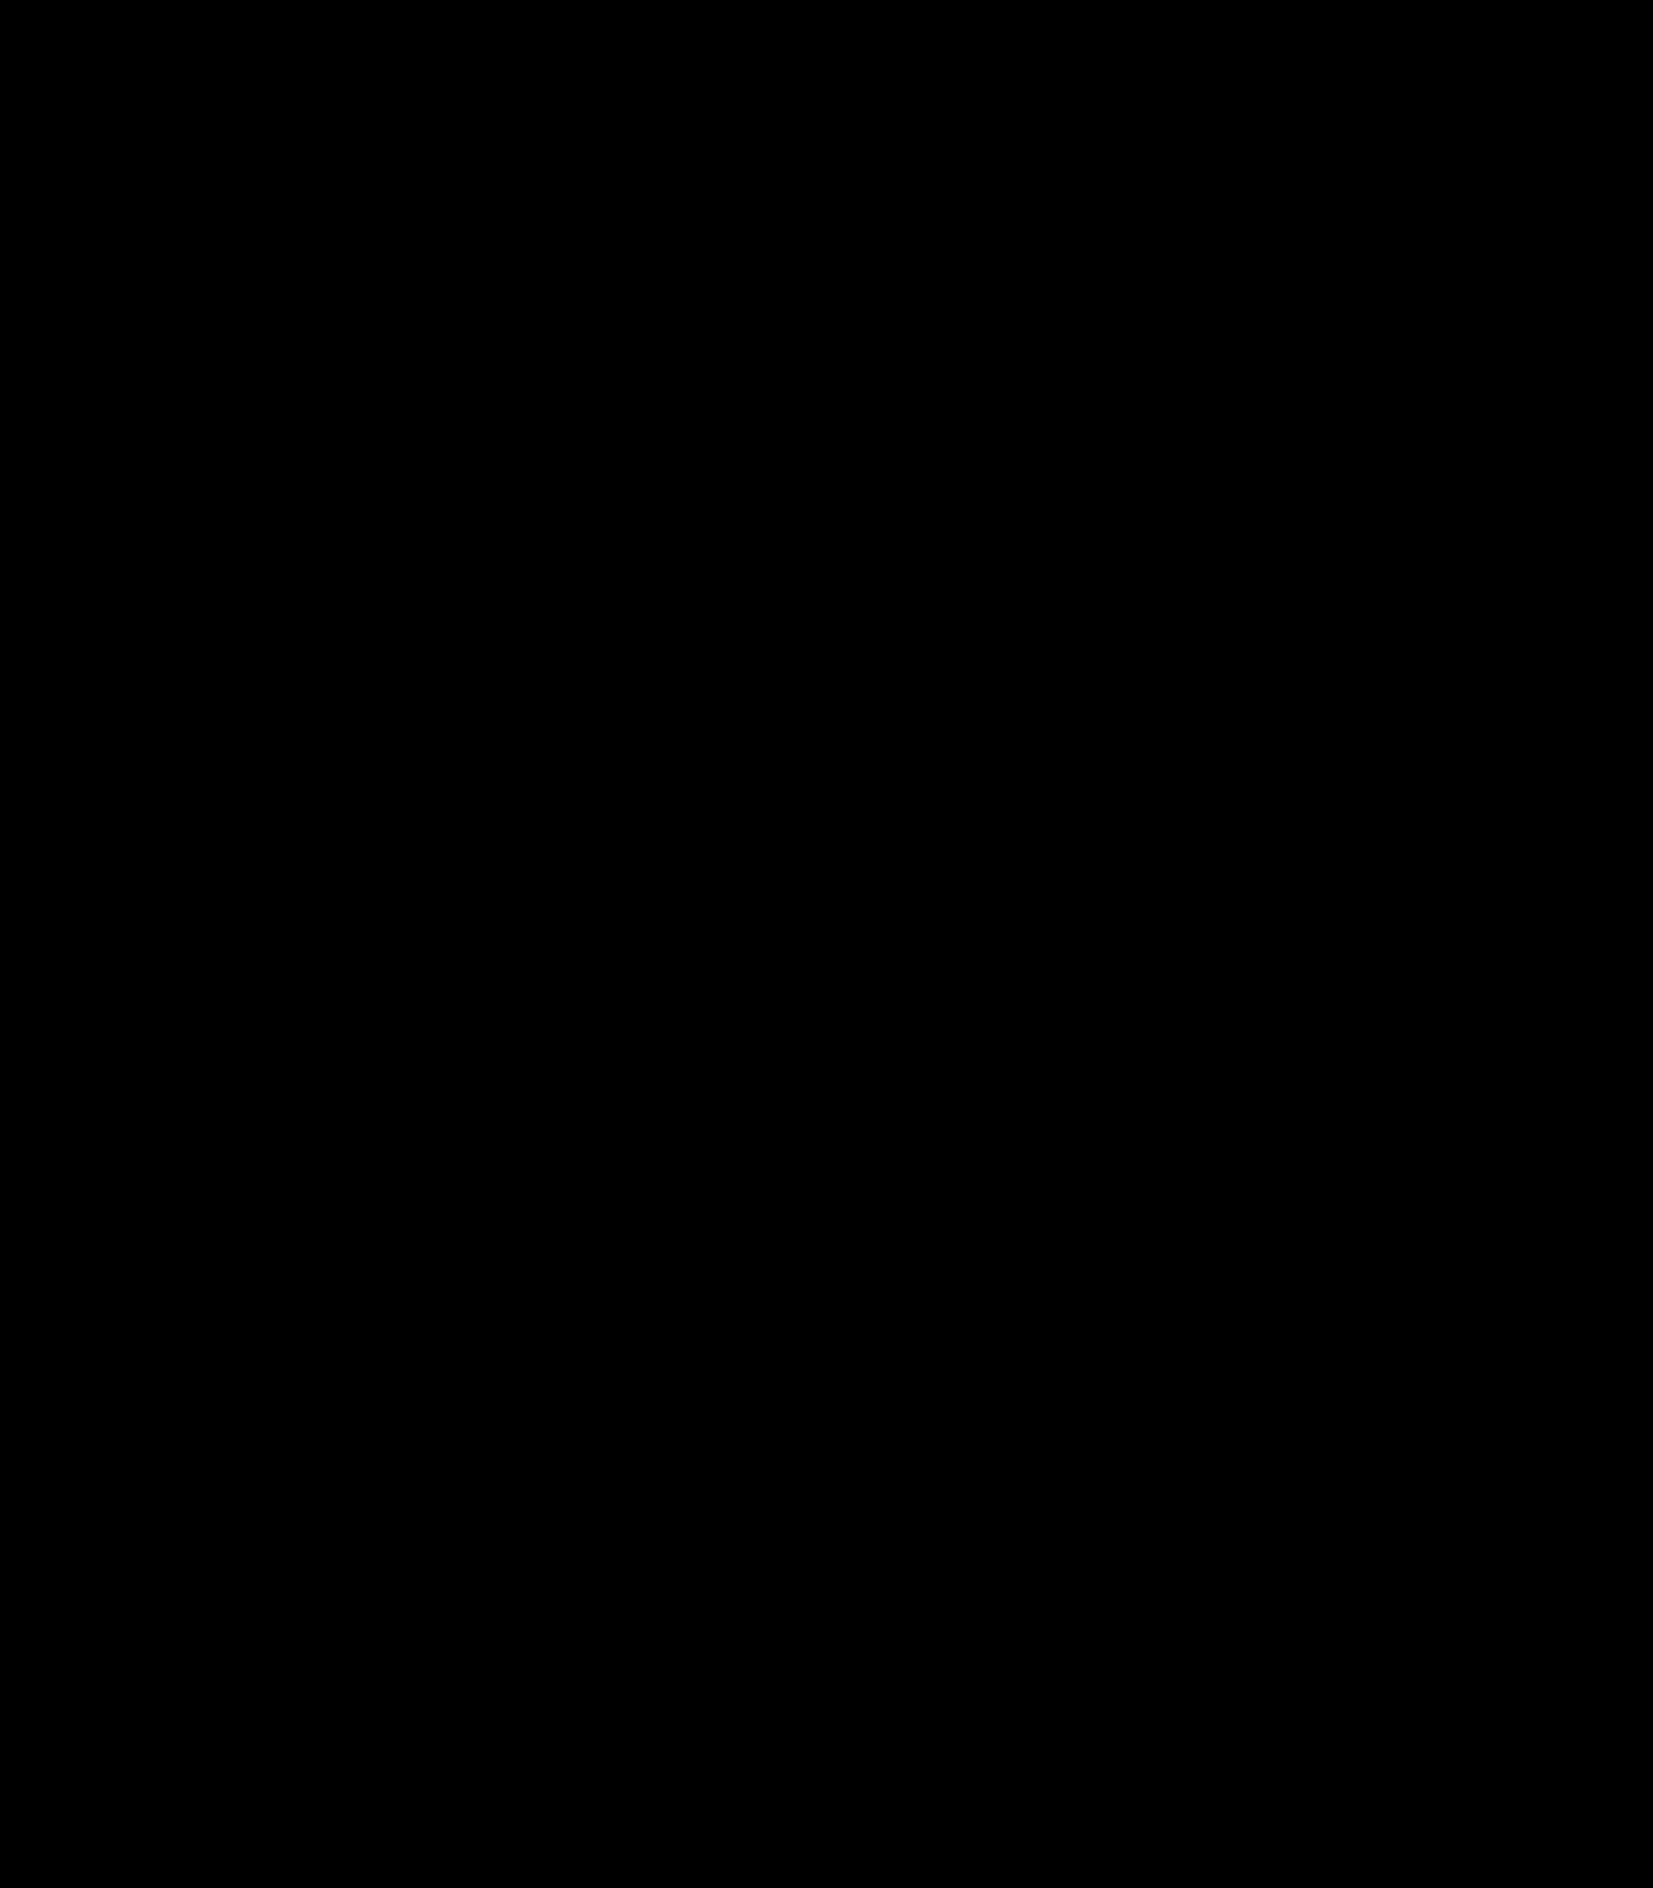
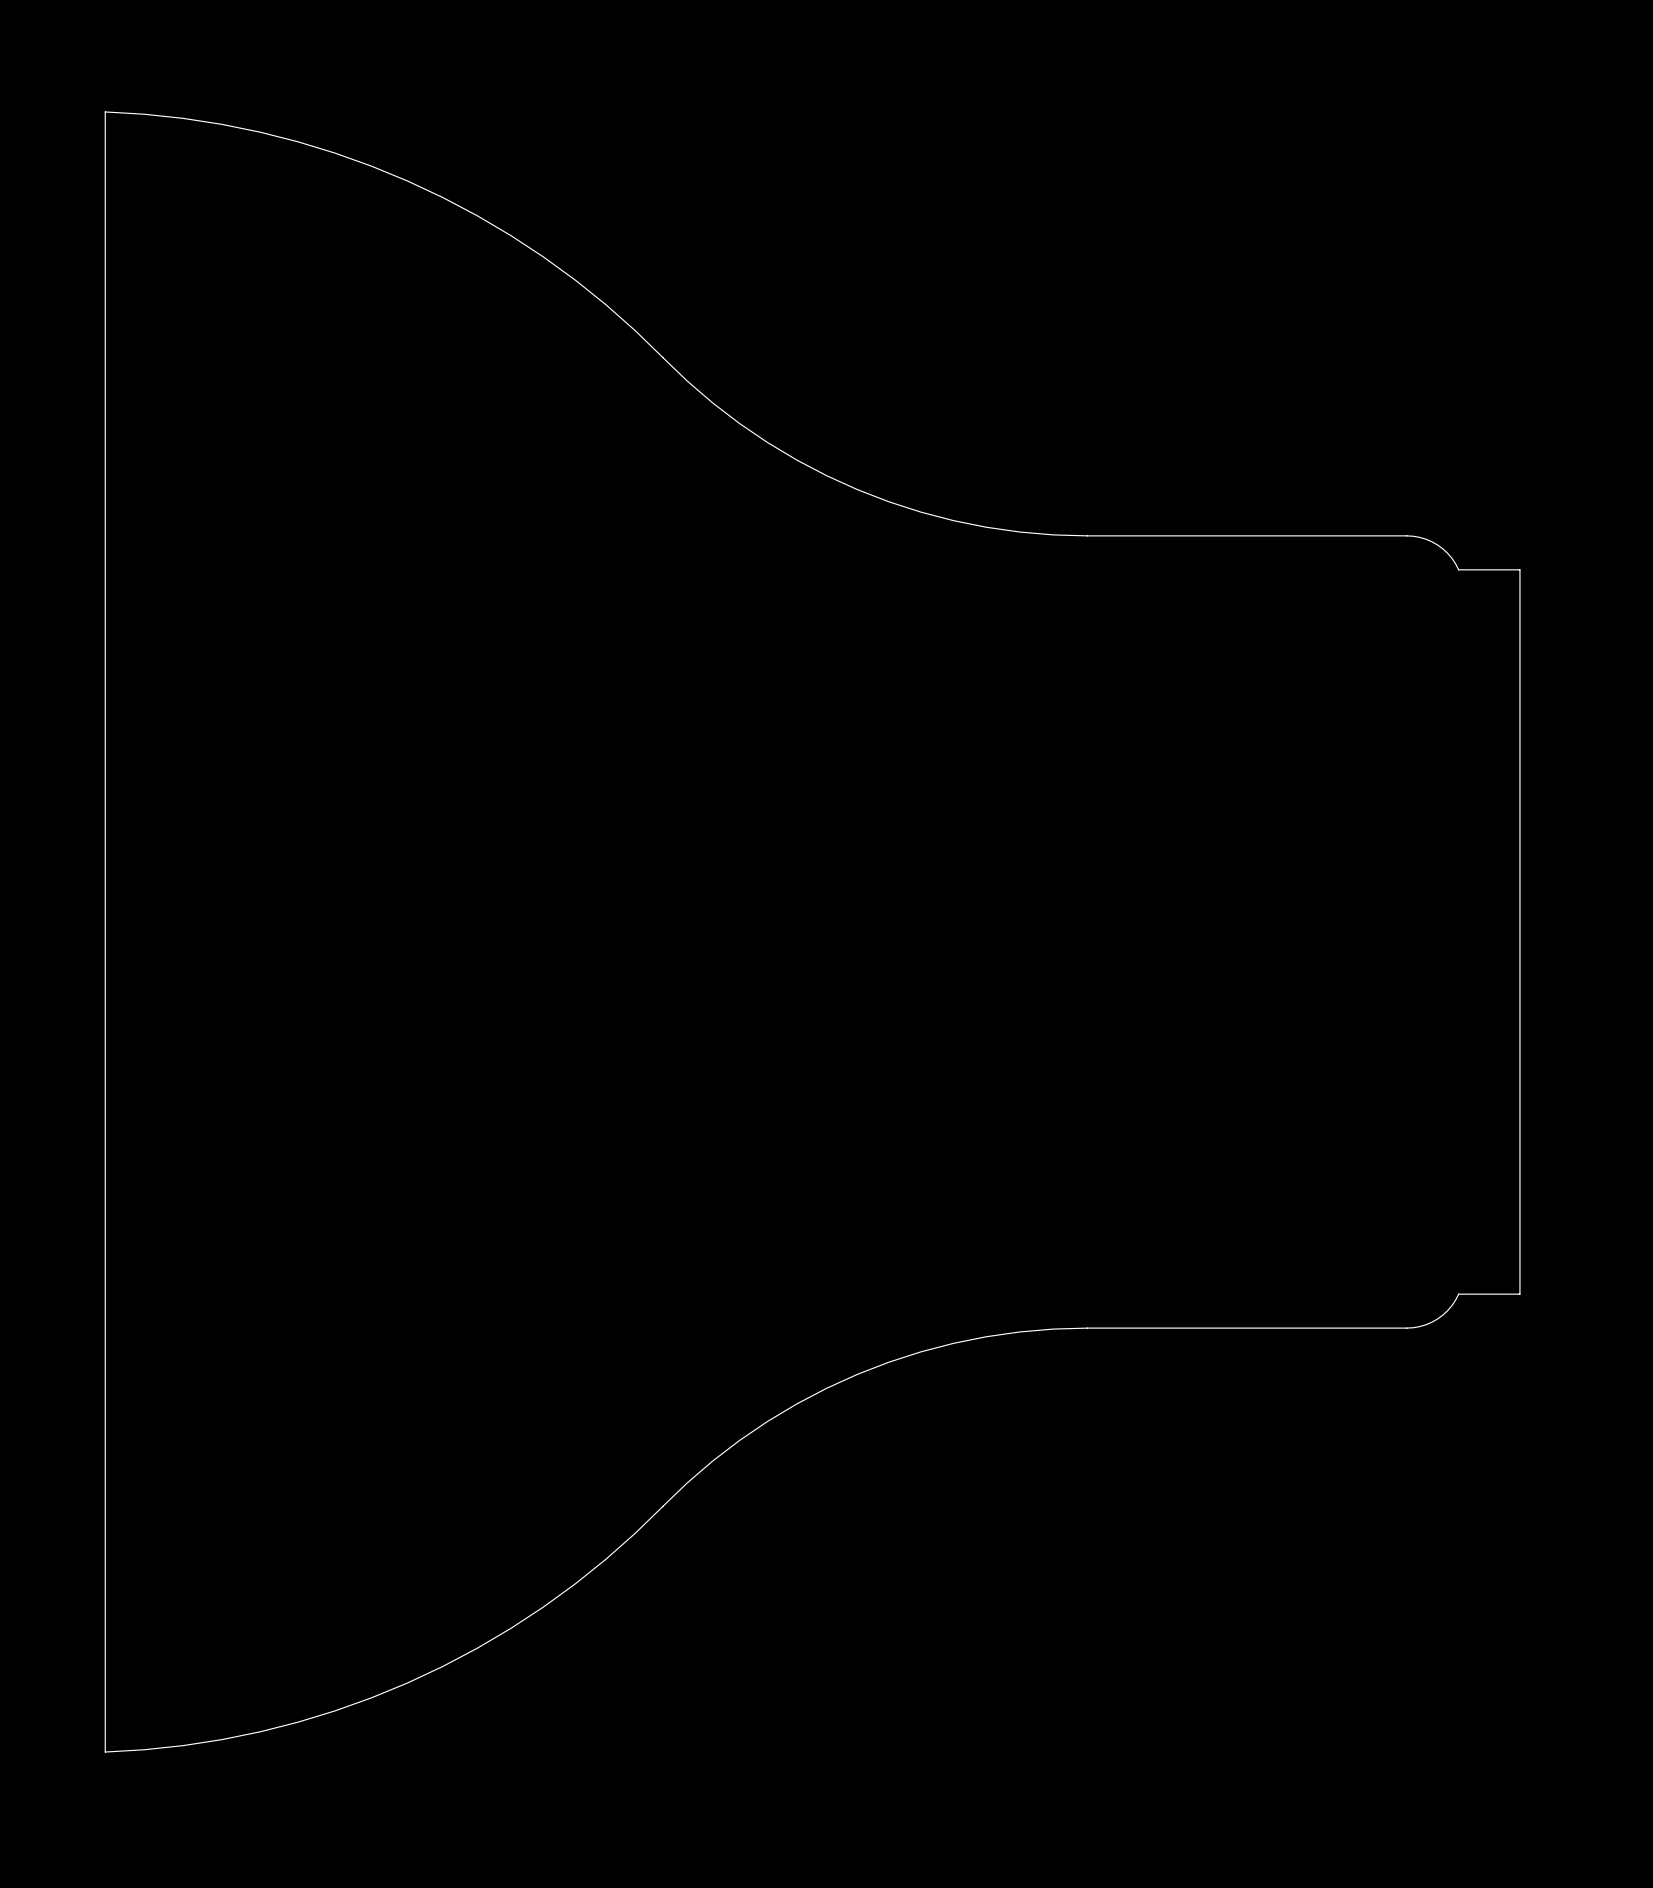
board edge: none -> (105, 111) (105, 1752) (183, 1745) (259, 1731) (334, 1710) (371, 1697) (443, 1666) (511, 1628) (575, 1583) (634, 1533) (687, 1482) (739, 1440) (796, 1404) (826, 1388) (888, 1362) (953, 1343) (1019, 1331) (1053, 1329) (1413, 1327) (1426, 1324) (1443, 1314) (1452, 1305) (1458, 1294) (1519, 1294) (1519, 569) (1458, 569) (1452, 558) (1443, 549) (1426, 539) (1413, 536) (1053, 534) (1019, 532) (953, 520) (888, 501) (826, 475) (796, 459) (739, 423) (687, 381) (634, 330) (575, 280) (511, 235) (443, 197) (371, 166) (334, 153) (259, 132) (183, 118) (105, 111)

